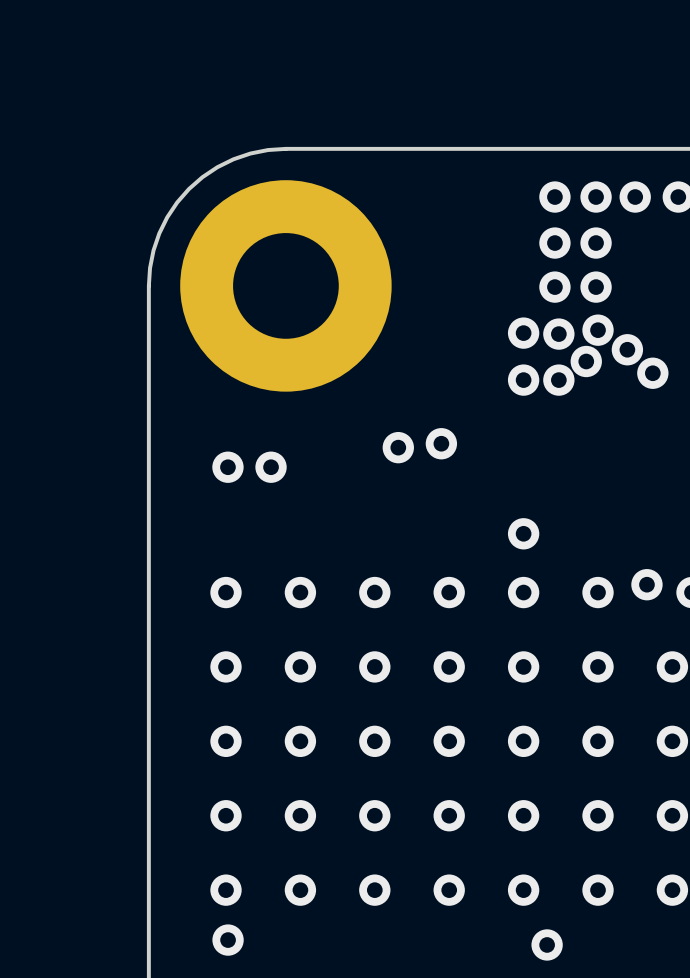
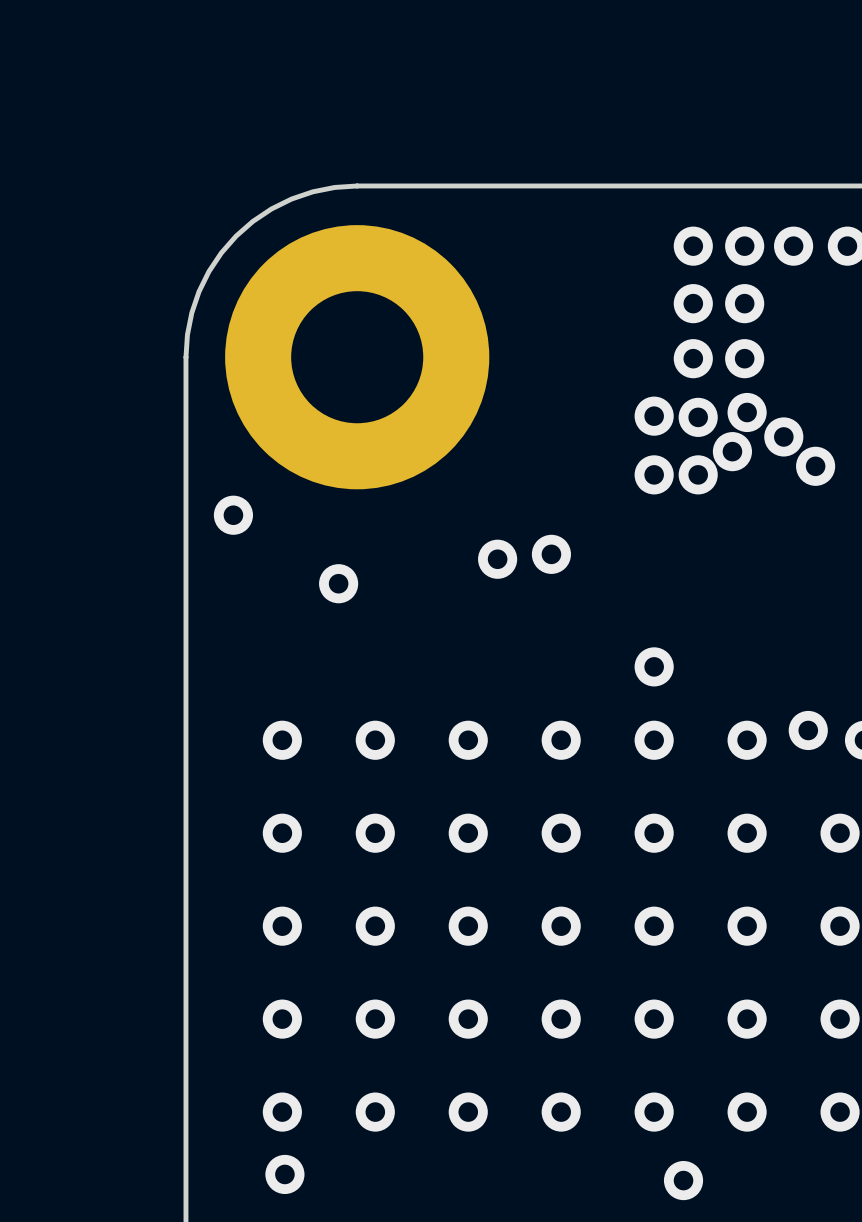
via position: (227, 467) -> (233, 515)

